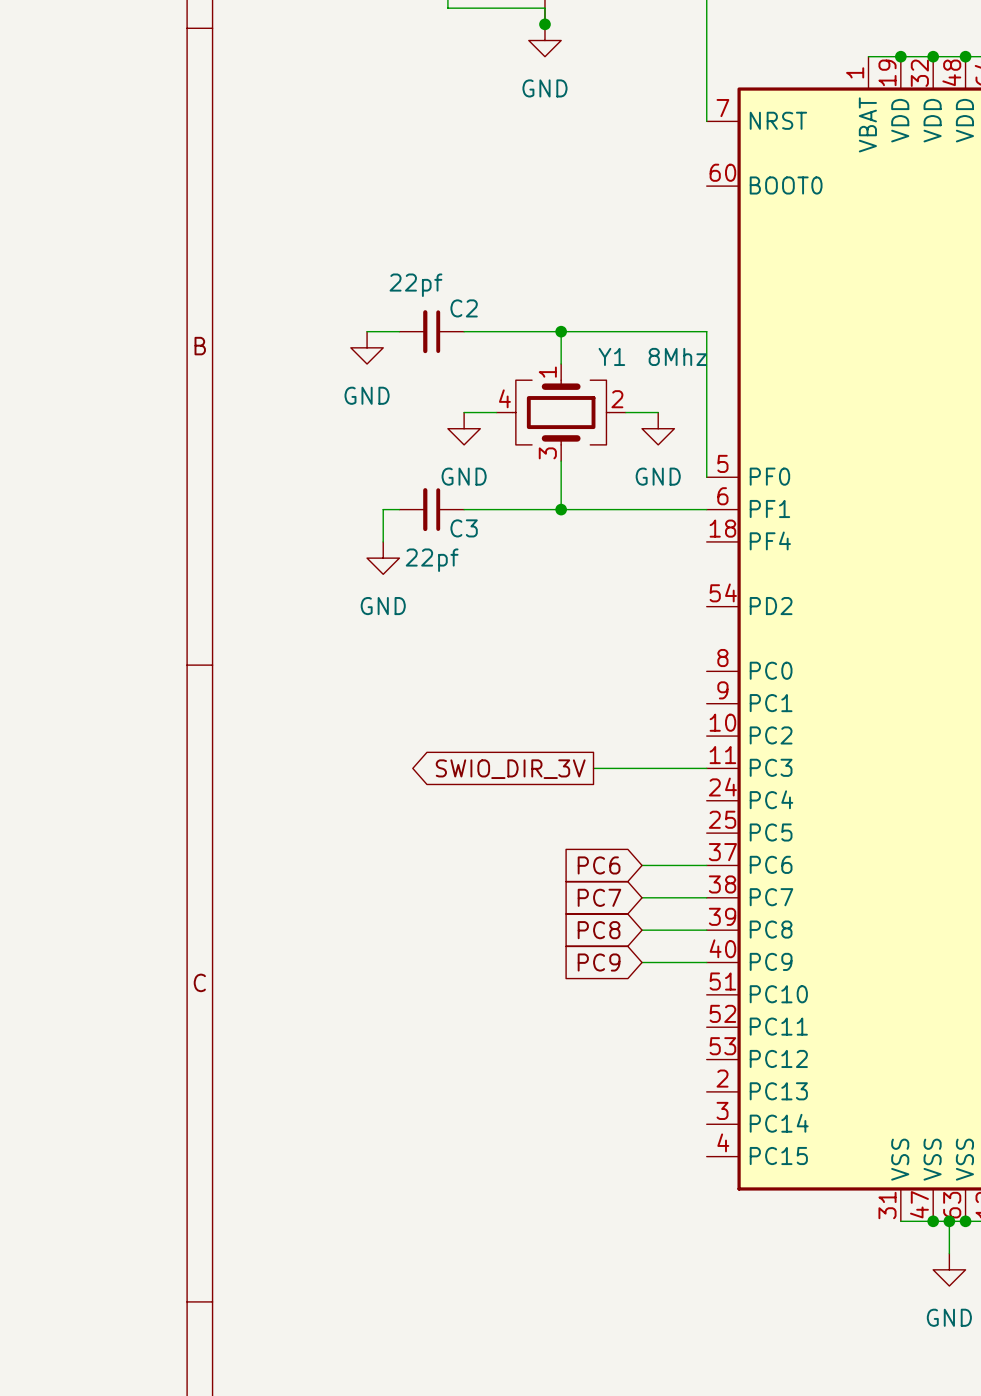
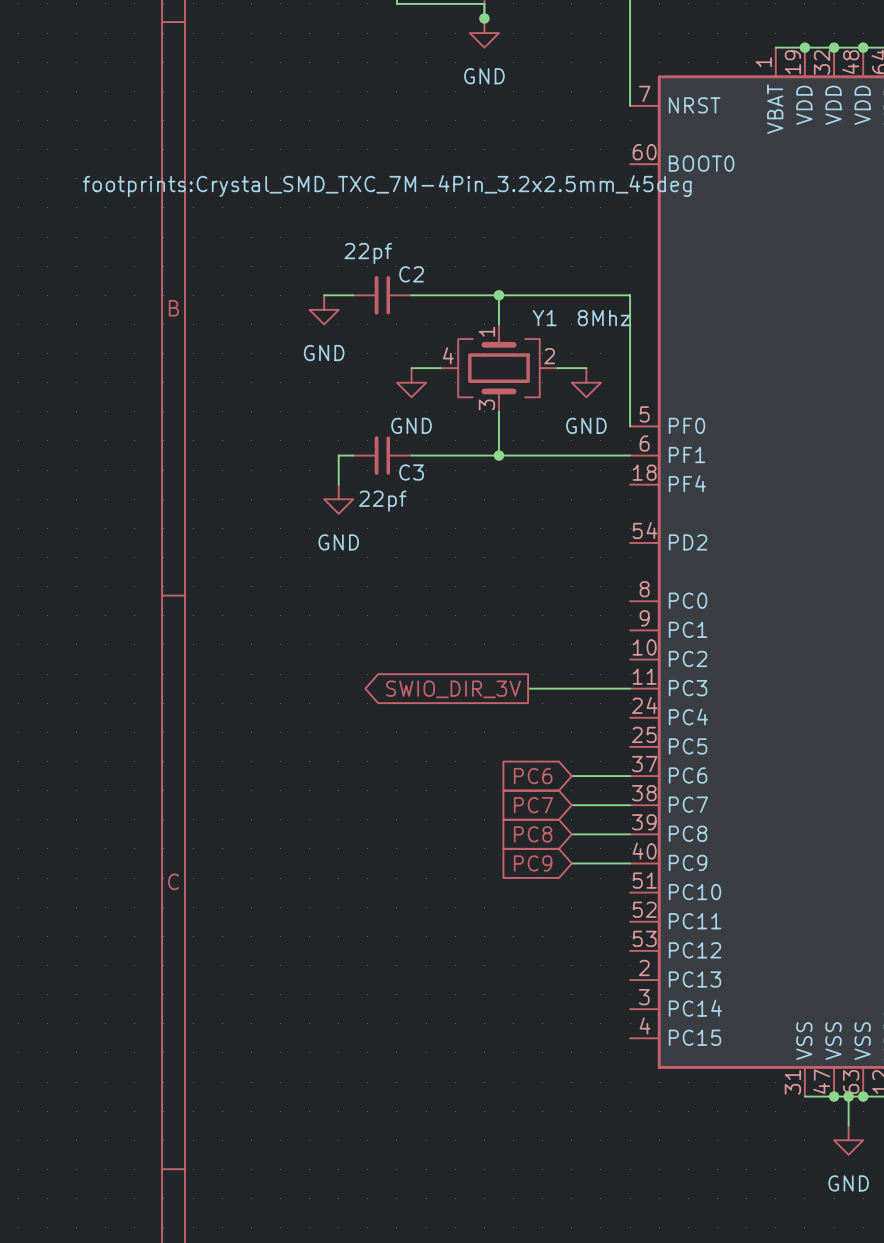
Y1 text: none -> footprints:Crystal_SMD_TXC_7M-4Pin_3.2x2.5mm_45deg (387, 186)

